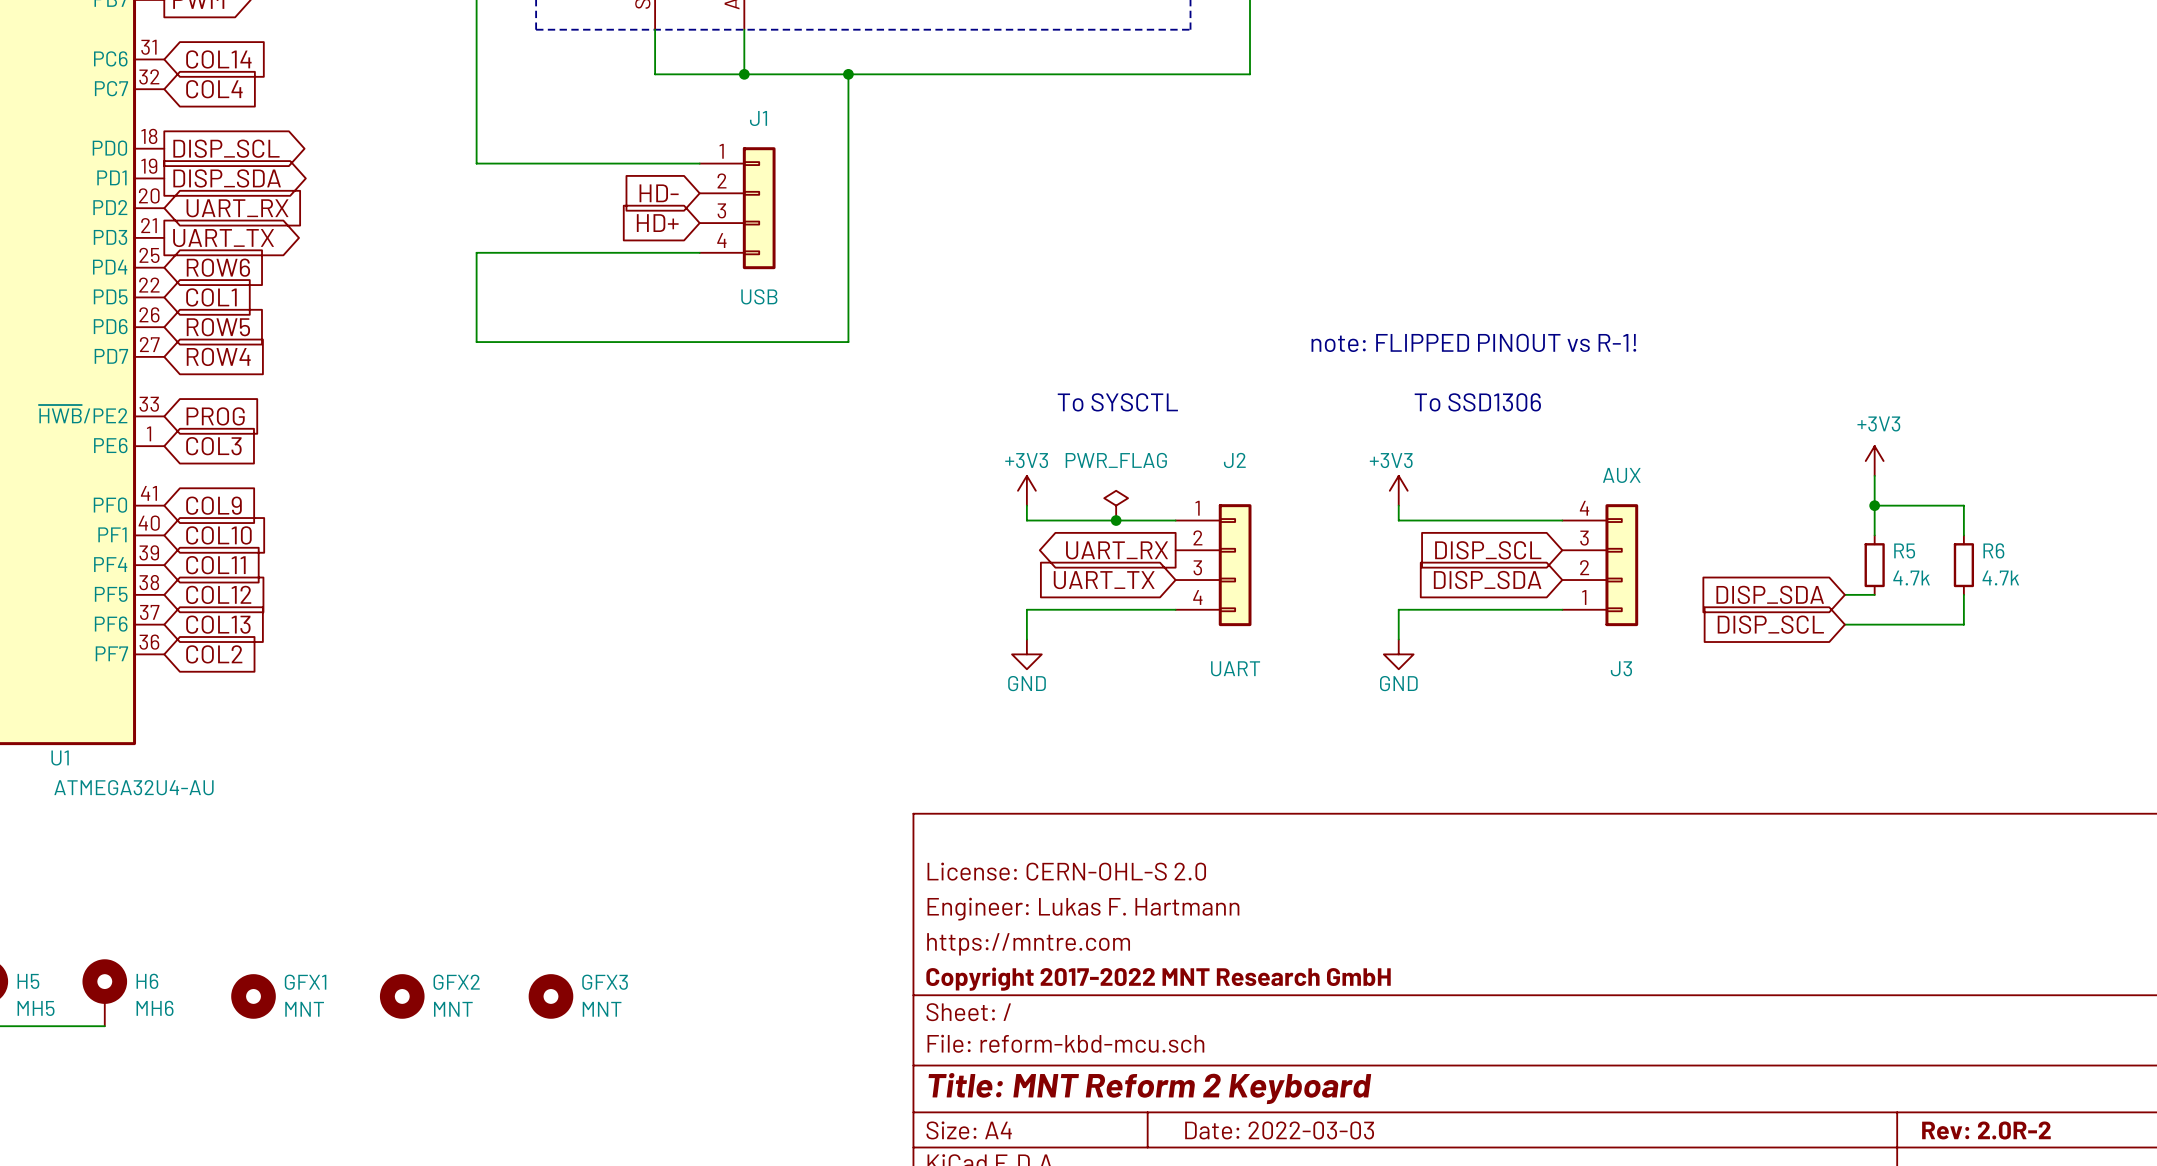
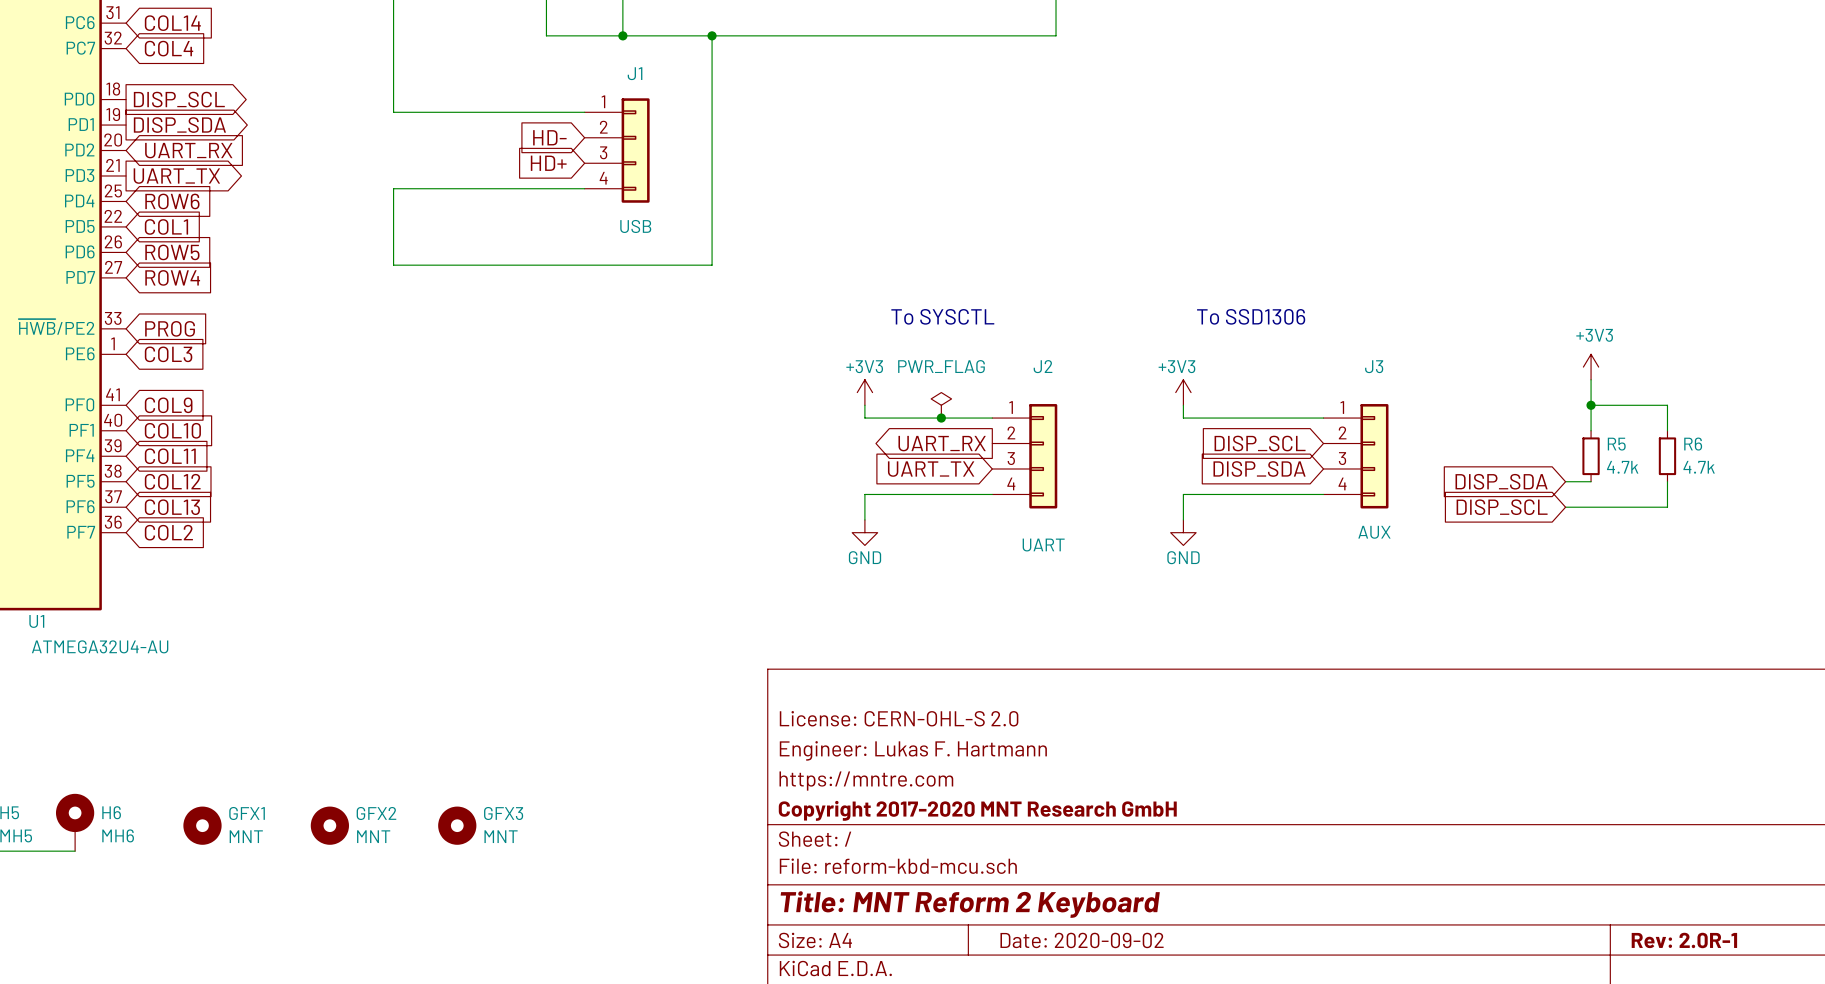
text: note: FLIPPED PINOUT vs R-1! (1473, 342) -> none
J3 flip: as is (1621, 565) -> up-down (1374, 456)
title block: Copyright 2017-2022 MNT Research GmbH (1158, 979) -> Copyright 2017-2020 MNT Research GmbH (977, 810)
title block: Date: 2022-03-03 (1279, 1130) -> Date: 2020-09-02 (1082, 940)
title block: Rev: 2.0R-2 (1986, 1130) -> Rev: 2.0R-1 (1684, 940)

